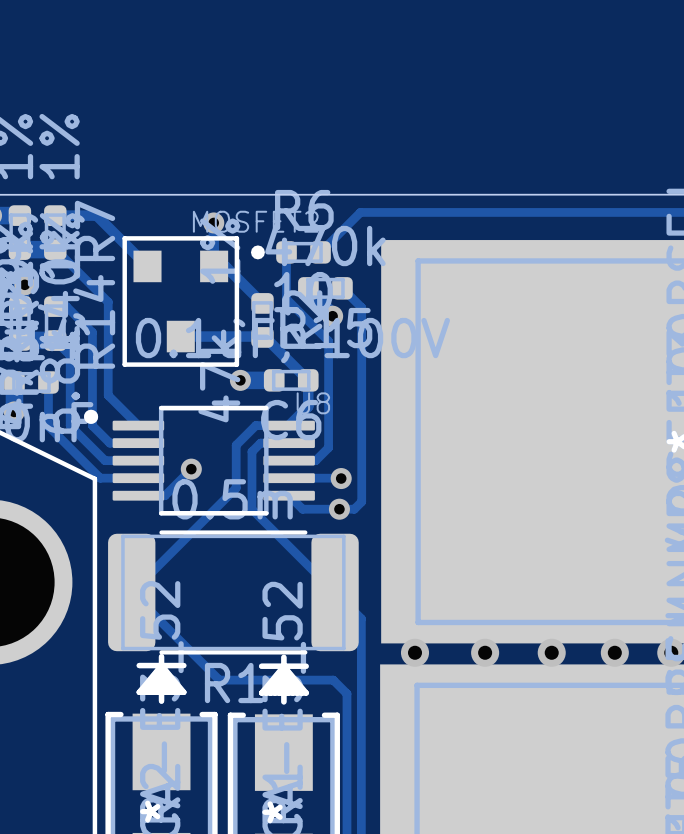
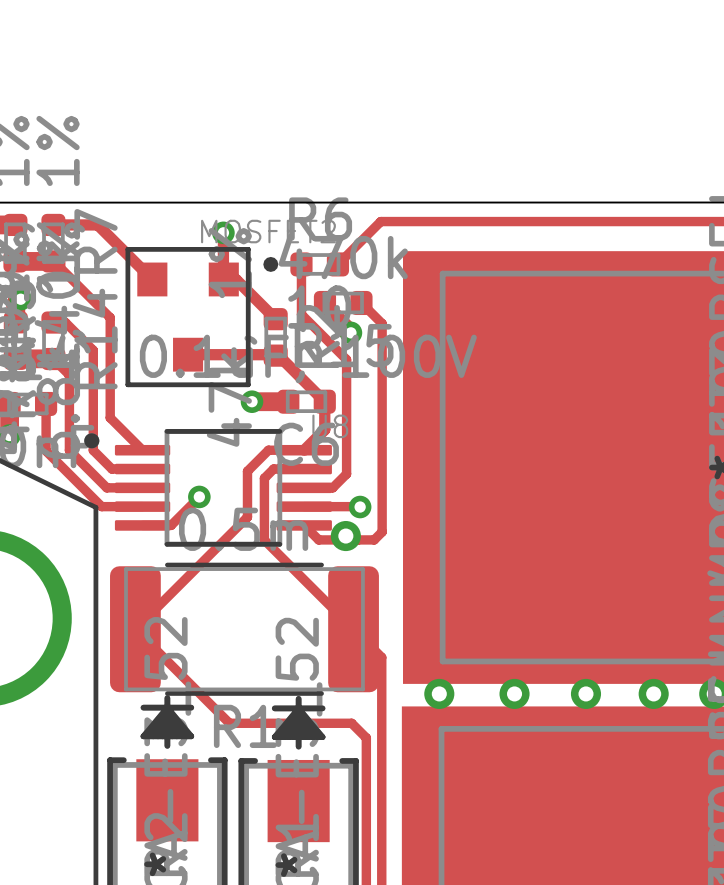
via size: [328, 498, 350, 520] -> [330, 520, 361, 552]

